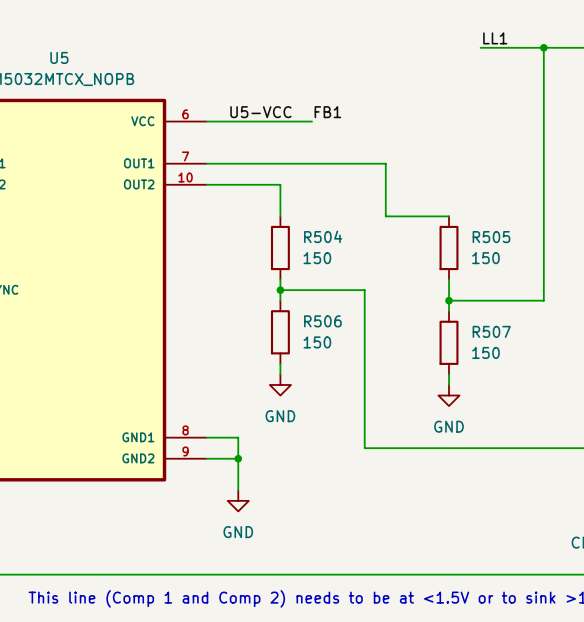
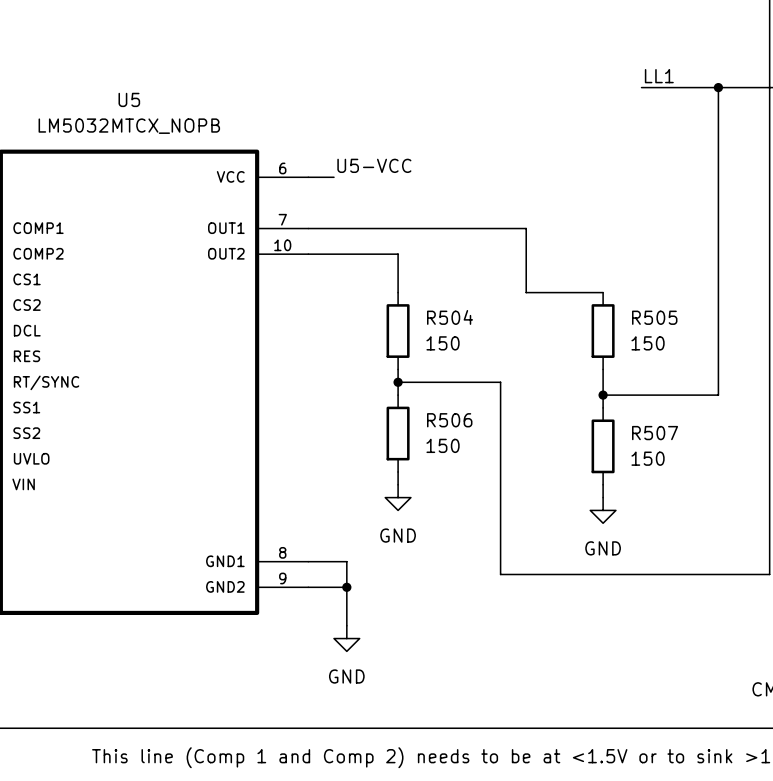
label: FB1 (327, 112) -> none
wire: (227, 121) (312, 121) -> none

